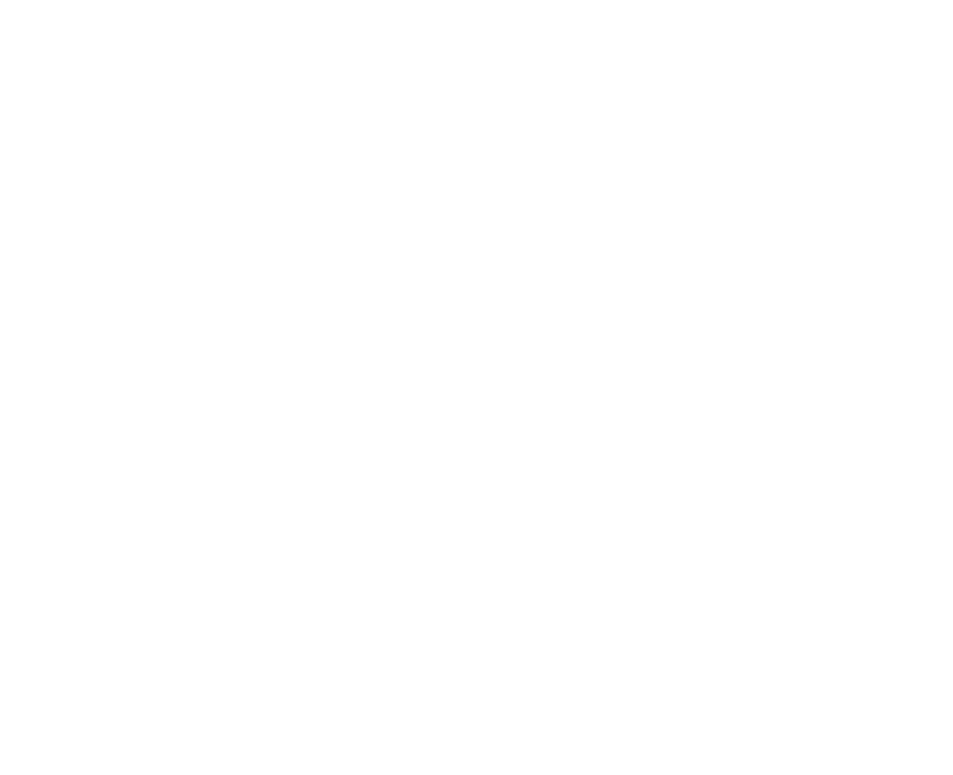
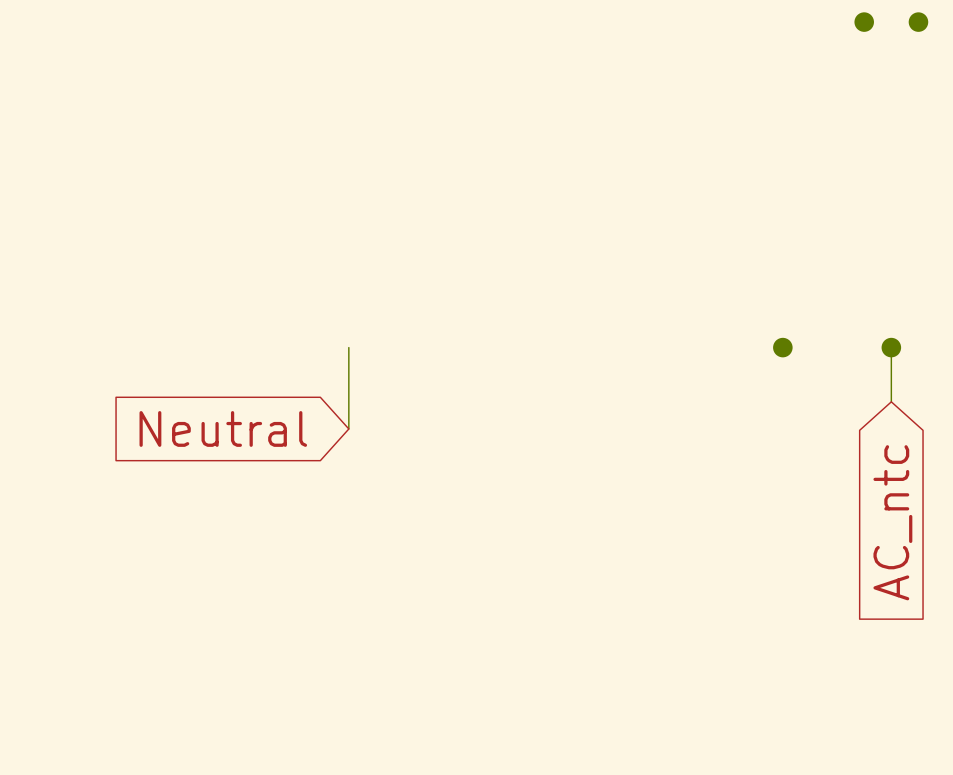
junction: none -> (864, 22)
junction: none -> (918, 22)
wire: none -> (348, 347) (348, 428)
junction: none -> (782, 347)
wire: none -> (891, 347) (891, 401)
junction: none -> (891, 347)
global label: none -> Neutral (223, 428)
global label: none -> AC_ntc (892, 522)

